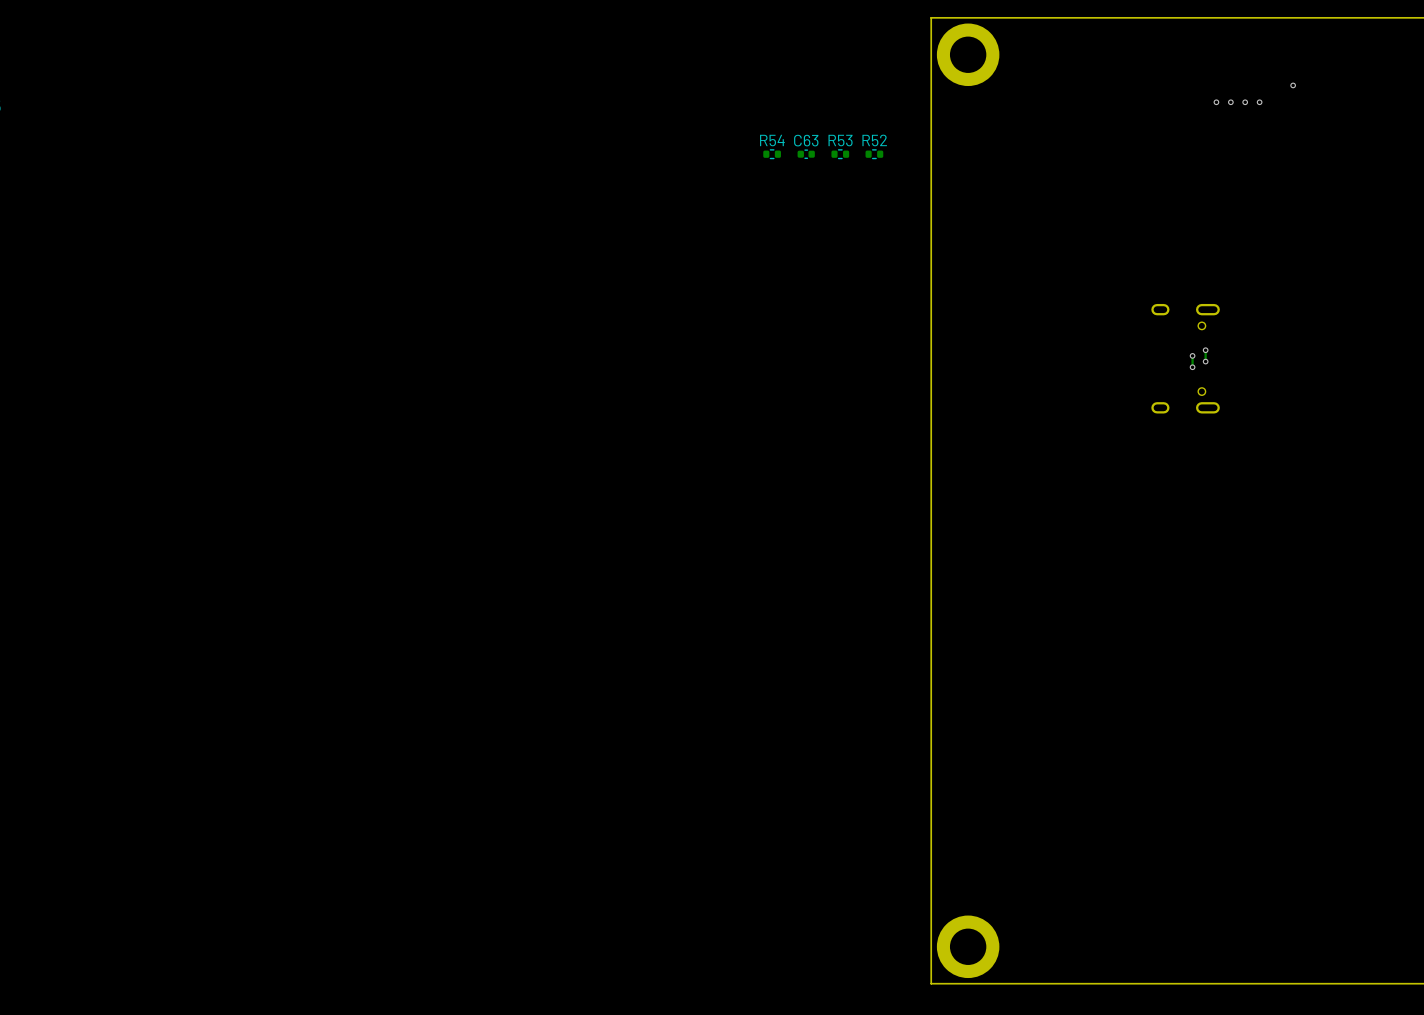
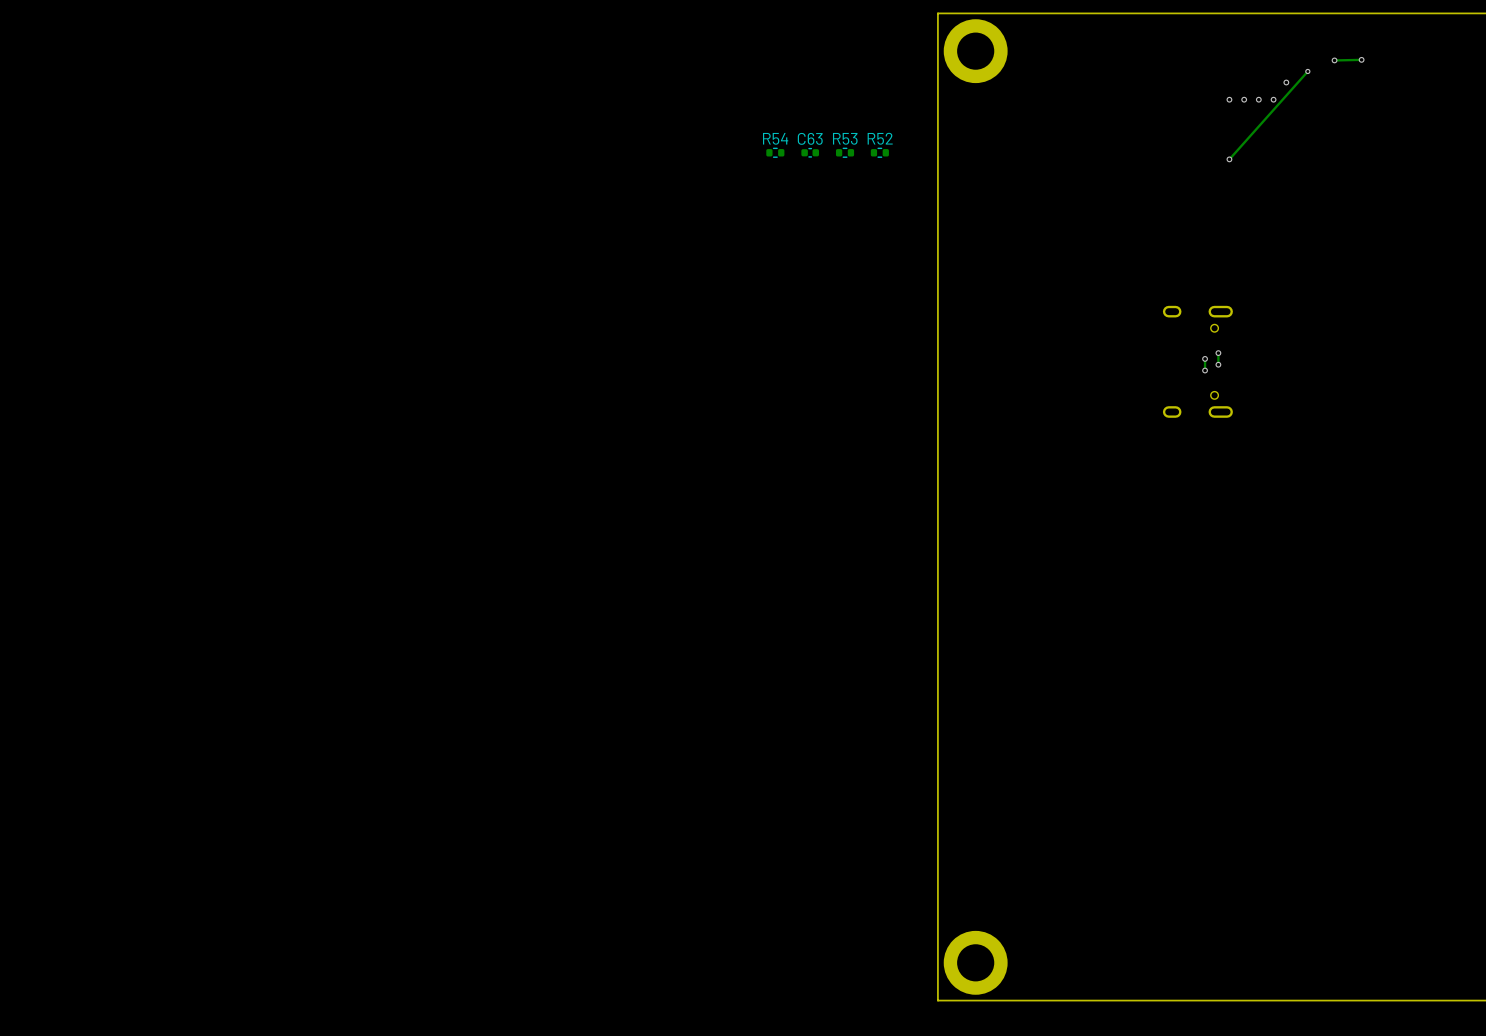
via: none -> (1334, 60)
track: none -> (1361, 59) (1334, 60)
via: none -> (1361, 59)
track: none -> (1307, 71) (1229, 159)
via: none -> (1307, 71)
via: none -> (1286, 82)
via: (1293, 85) -> none
via: none -> (1229, 159)

